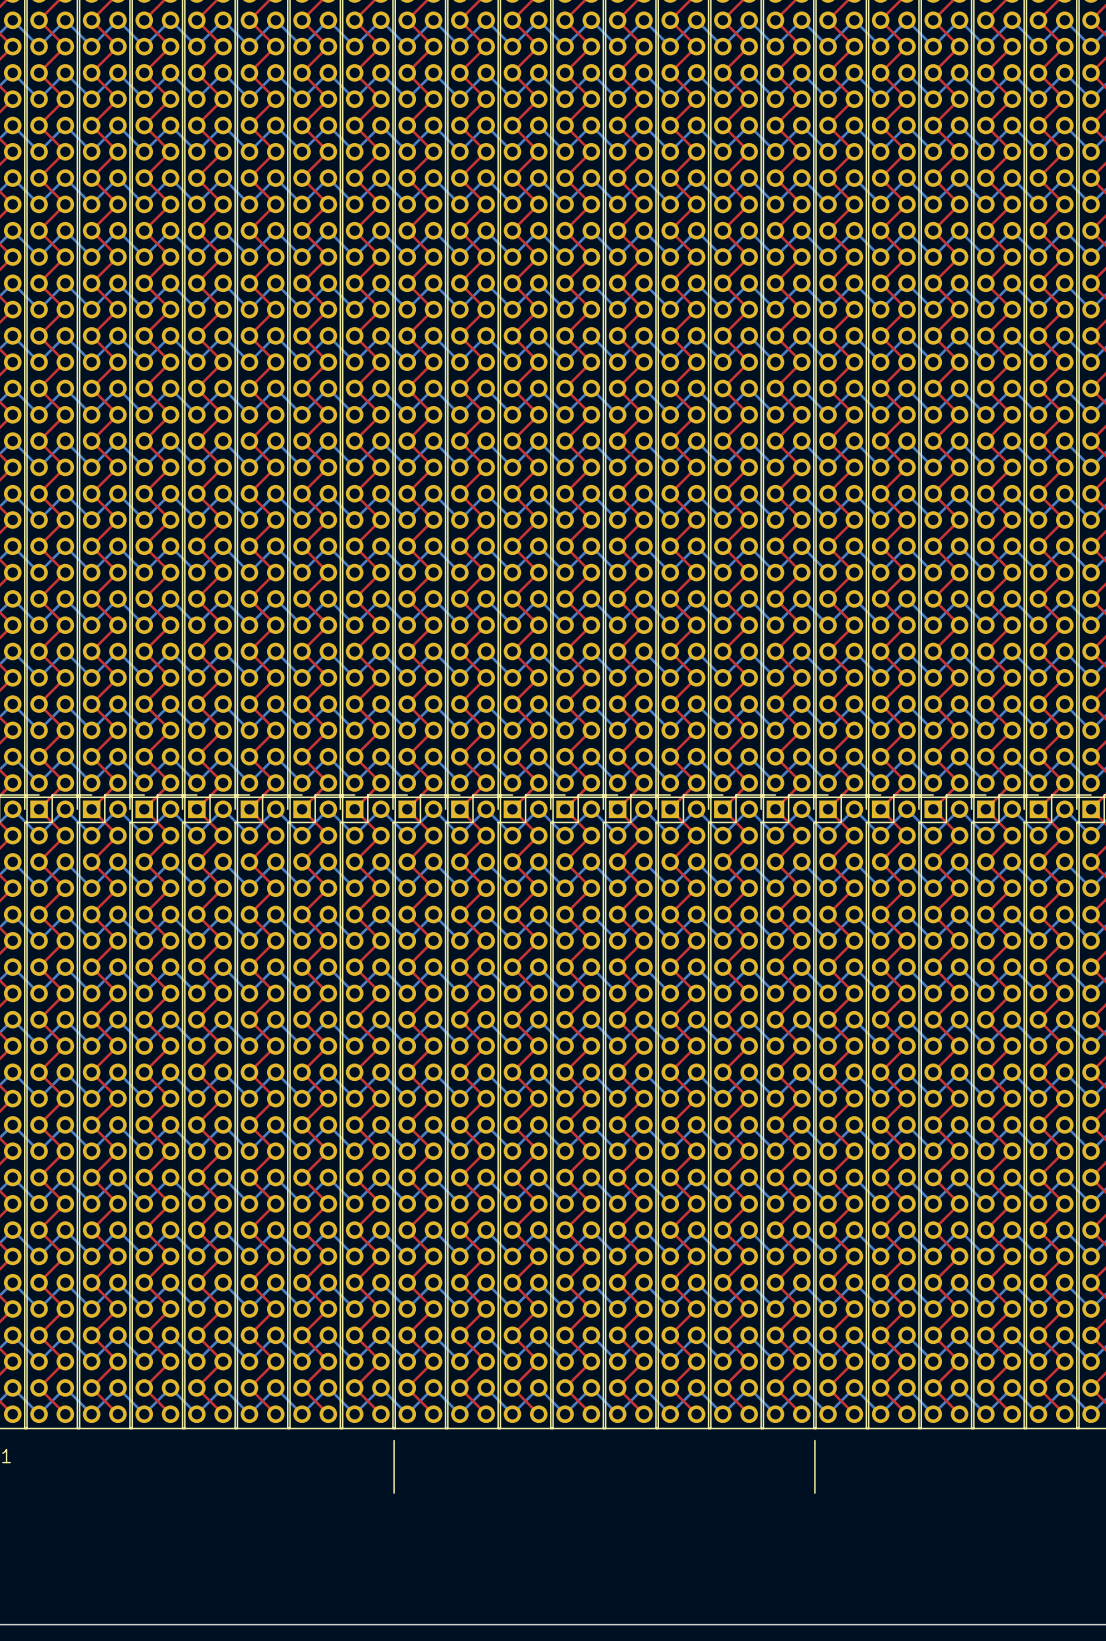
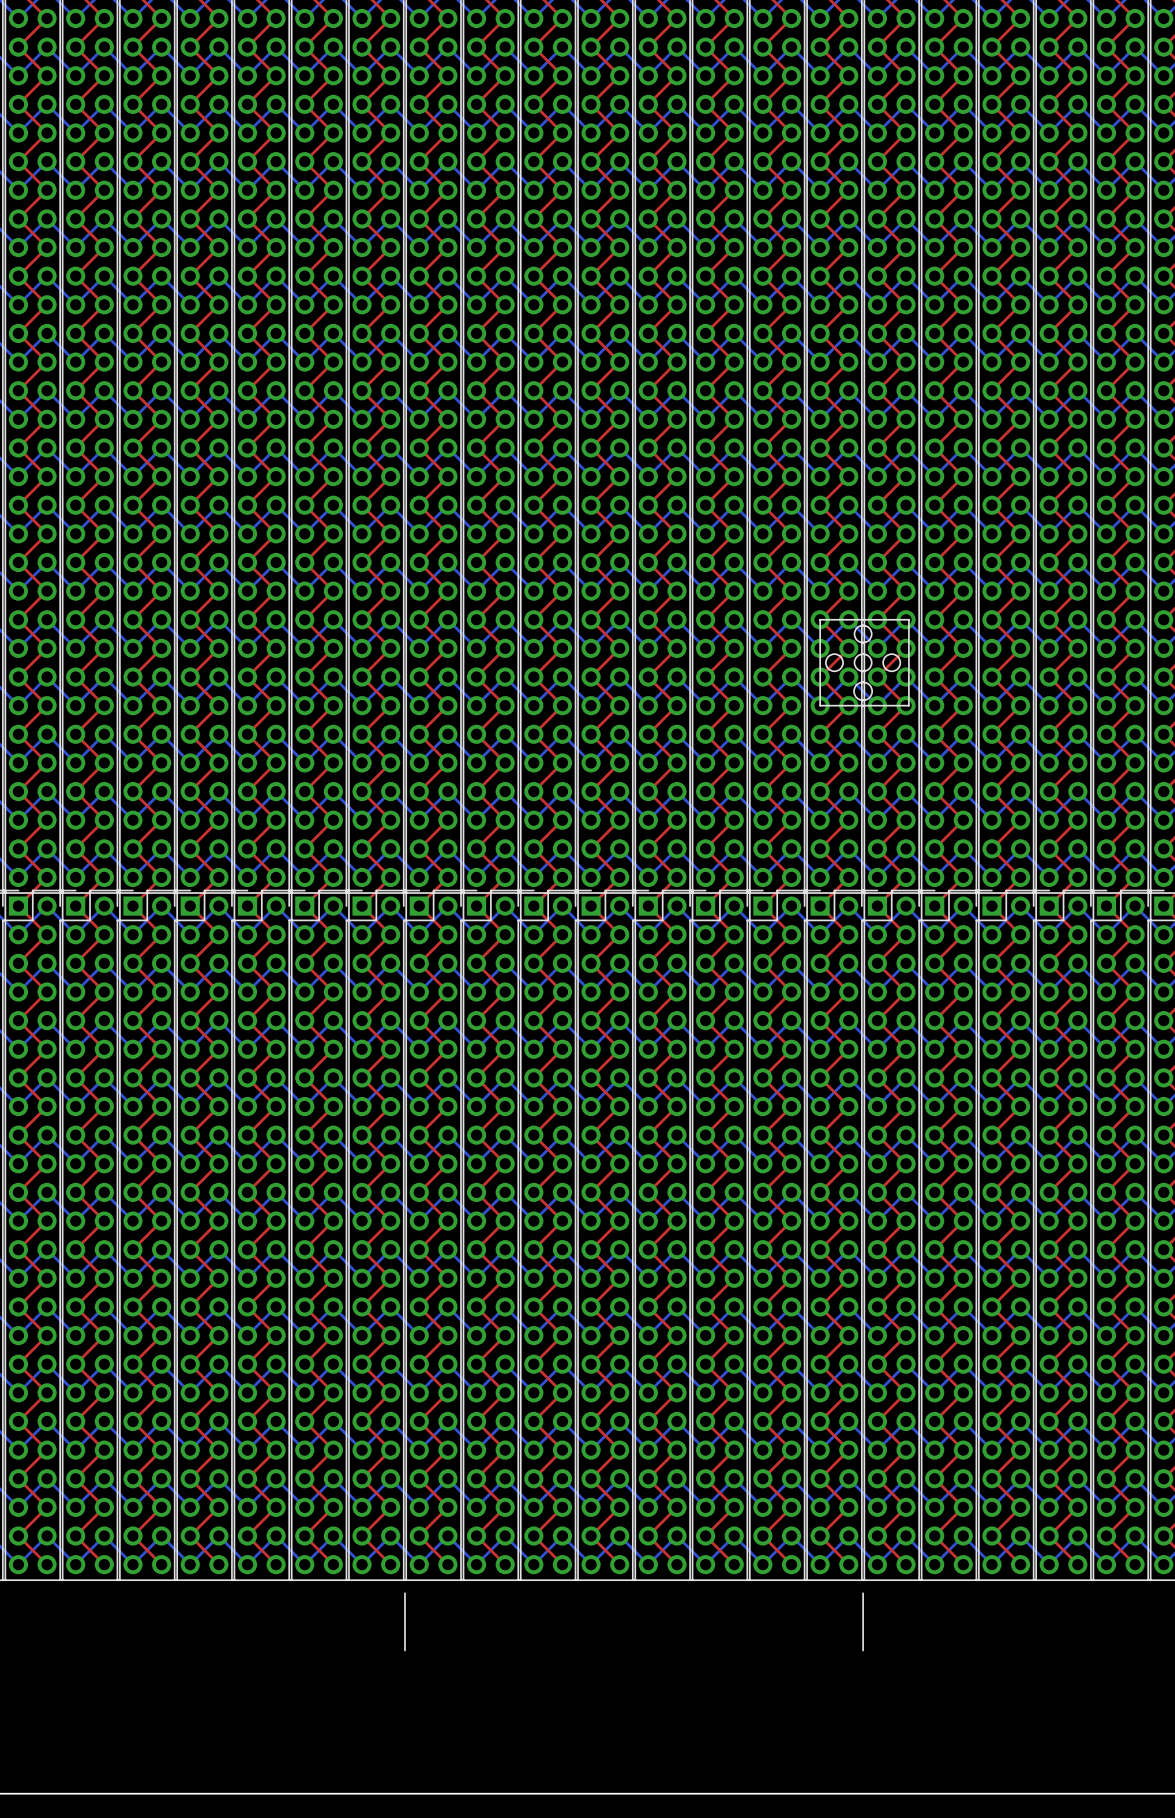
line: none -> (820, 619) (908, 619) (908, 705) (820, 705) (820, 619)
drawing: none -> [825, 624, 901, 701]

